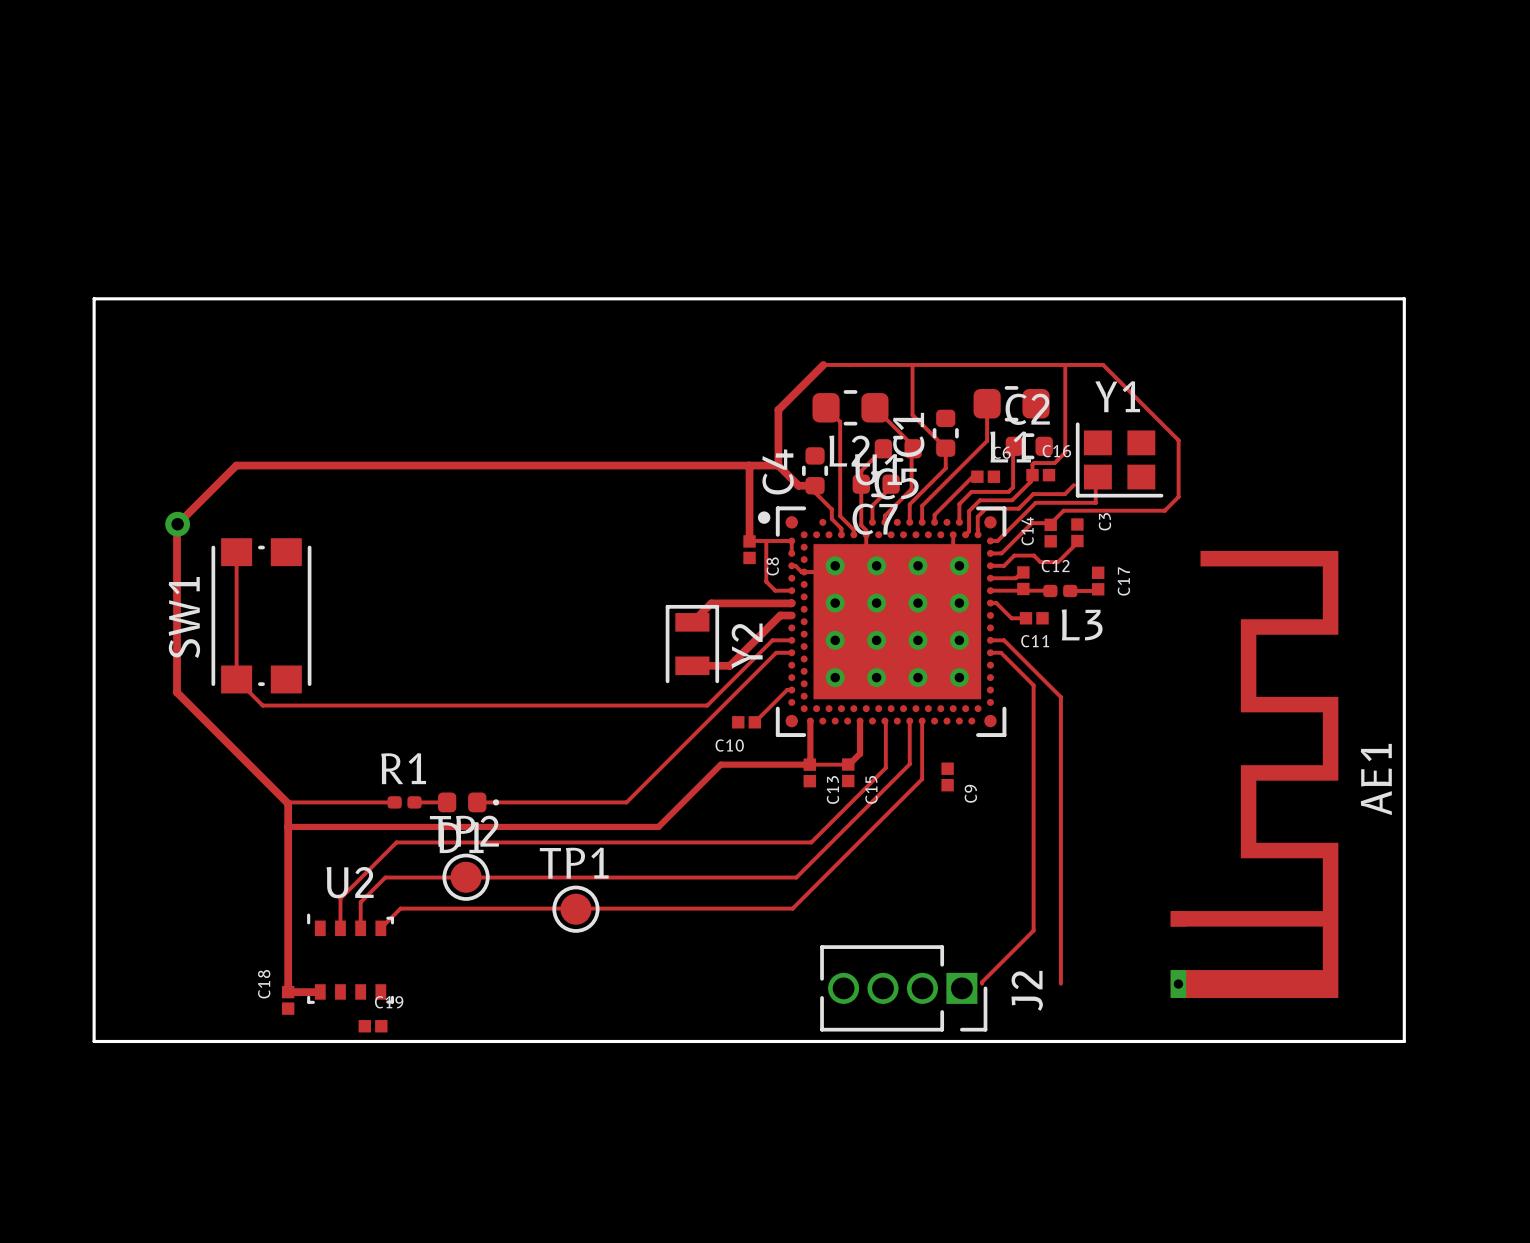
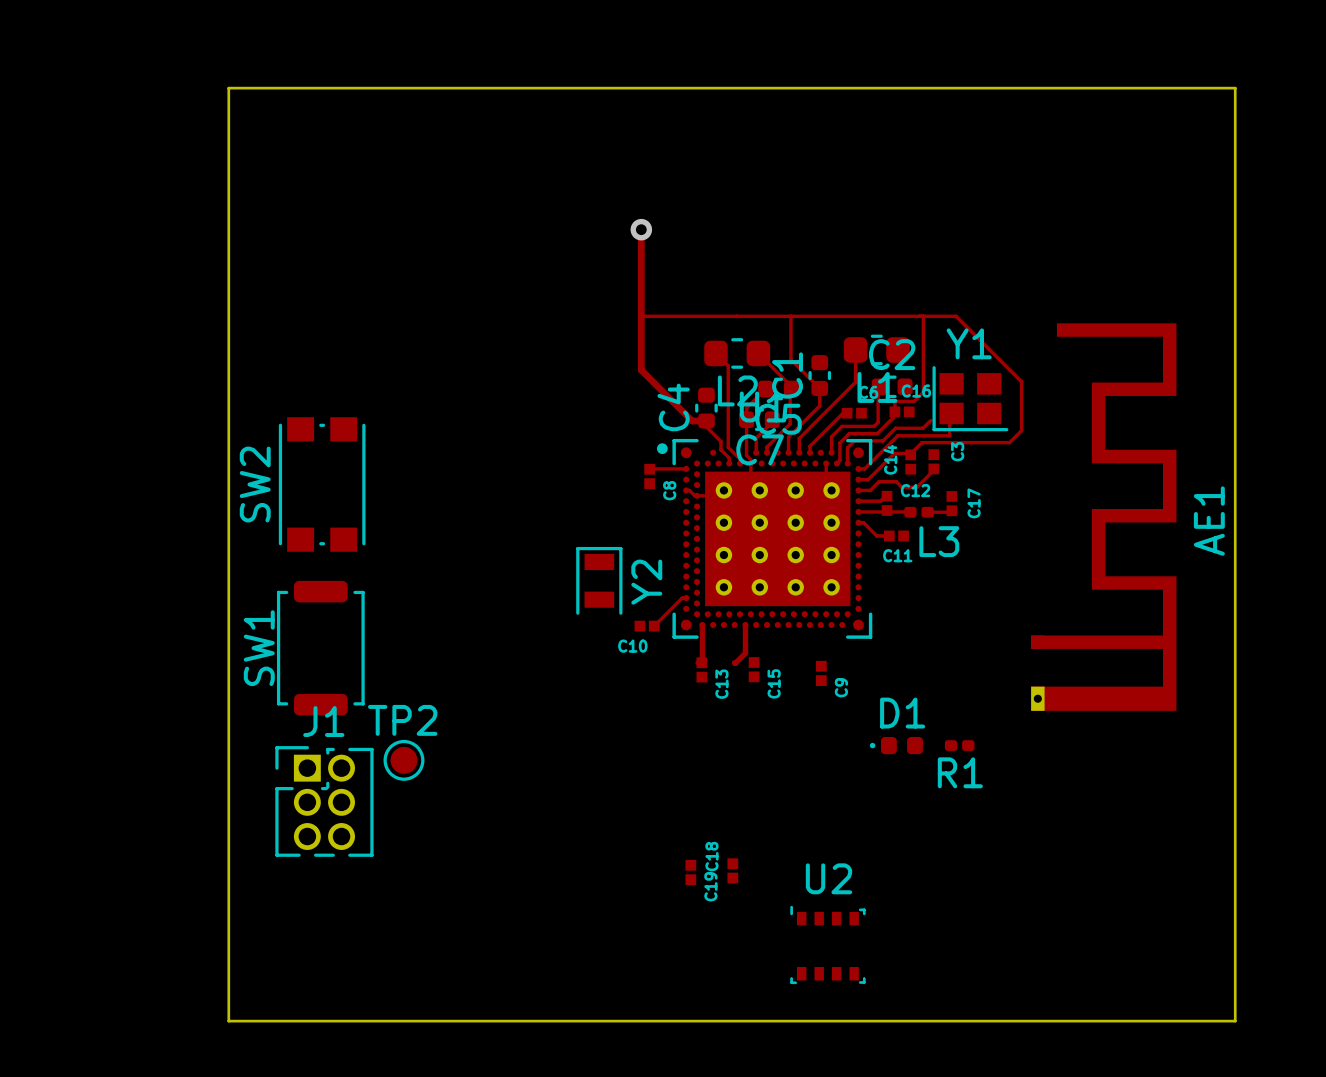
track: none -> (641, 229) (641, 370) (674, 403)
via: none -> (641, 229)
board edge: (94, 298) (1404, 298) (1404, 1041) (94, 1041) (94, 298) -> (228, 88) (228, 1021) (1235, 1021) (1235, 88) (228, 88)
track: (823, 364) (778, 409) (778, 465) (236, 465) (177, 524) (177, 692) (288, 803) -> (713, 316) (641, 316)
track: (748, 465) (749, 541) -> none
via: (177, 524) -> none
SW1 footprint: [211, 538, 312, 694] -> [276, 580, 365, 716]
track: (766, 540) (766, 581) (775, 590) (791, 590) -> none
track: (791, 540) (791, 553) -> none
track: (236, 552) (236, 679) (262, 705) (707, 705) (772, 640) (791, 640) -> none
SW2: none -> (322, 484)
track: (791, 603) (711, 603) (691, 623) -> none
track: (791, 615) (780, 615) (729, 665) (692, 665) -> none
track: (990, 640) (1004, 640) (1060, 697) (1060, 983) -> none
Y2 position: (692, 644) -> (599, 580)
track: (791, 652) (776, 652) (626, 802) (477, 802) -> none
track: (990, 652) (1001, 652) (1033, 685) (1033, 930) (982, 983) -> none
track: (884, 721) (885, 767) (811, 842) (396, 842) (340, 898) (340, 928) -> none
track: (909, 721) (909, 764) (796, 877) (385, 877) (360, 902) (360, 928) -> none
track: (922, 721) (922, 779) (792, 908) (400, 908) (380, 928) -> none
track: (805, 764) (720, 764) (658, 826) (288, 826) -> none
track: (809, 764) (848, 764) -> none
R1 name position: R1 (403, 768) -> R1 (960, 772)
C15 position: (848, 772) -> (754, 669)
AE1 position: (1254, 774) -> (1103, 517)
track: (394, 802) (288, 803) -> none
R1 position: (404, 802) -> (959, 745)
track: (414, 802) (447, 802) -> none
D1 rotation: 0° (468, 802) -> 180° (896, 745)
D1 position: (468, 802) -> (896, 745)
track: (288, 803) (288, 992) (320, 992) -> none
TP1: (575, 909) -> none
J1: none -> (324, 801)
U2 position: (350, 958) -> (827, 944)
J2: (903, 988) -> none
C18 position: (288, 1000) -> (732, 870)
C19 rotation: 0° (373, 1026) -> 90° clockwise (690, 872)
C19 position: (373, 1026) -> (690, 872)

